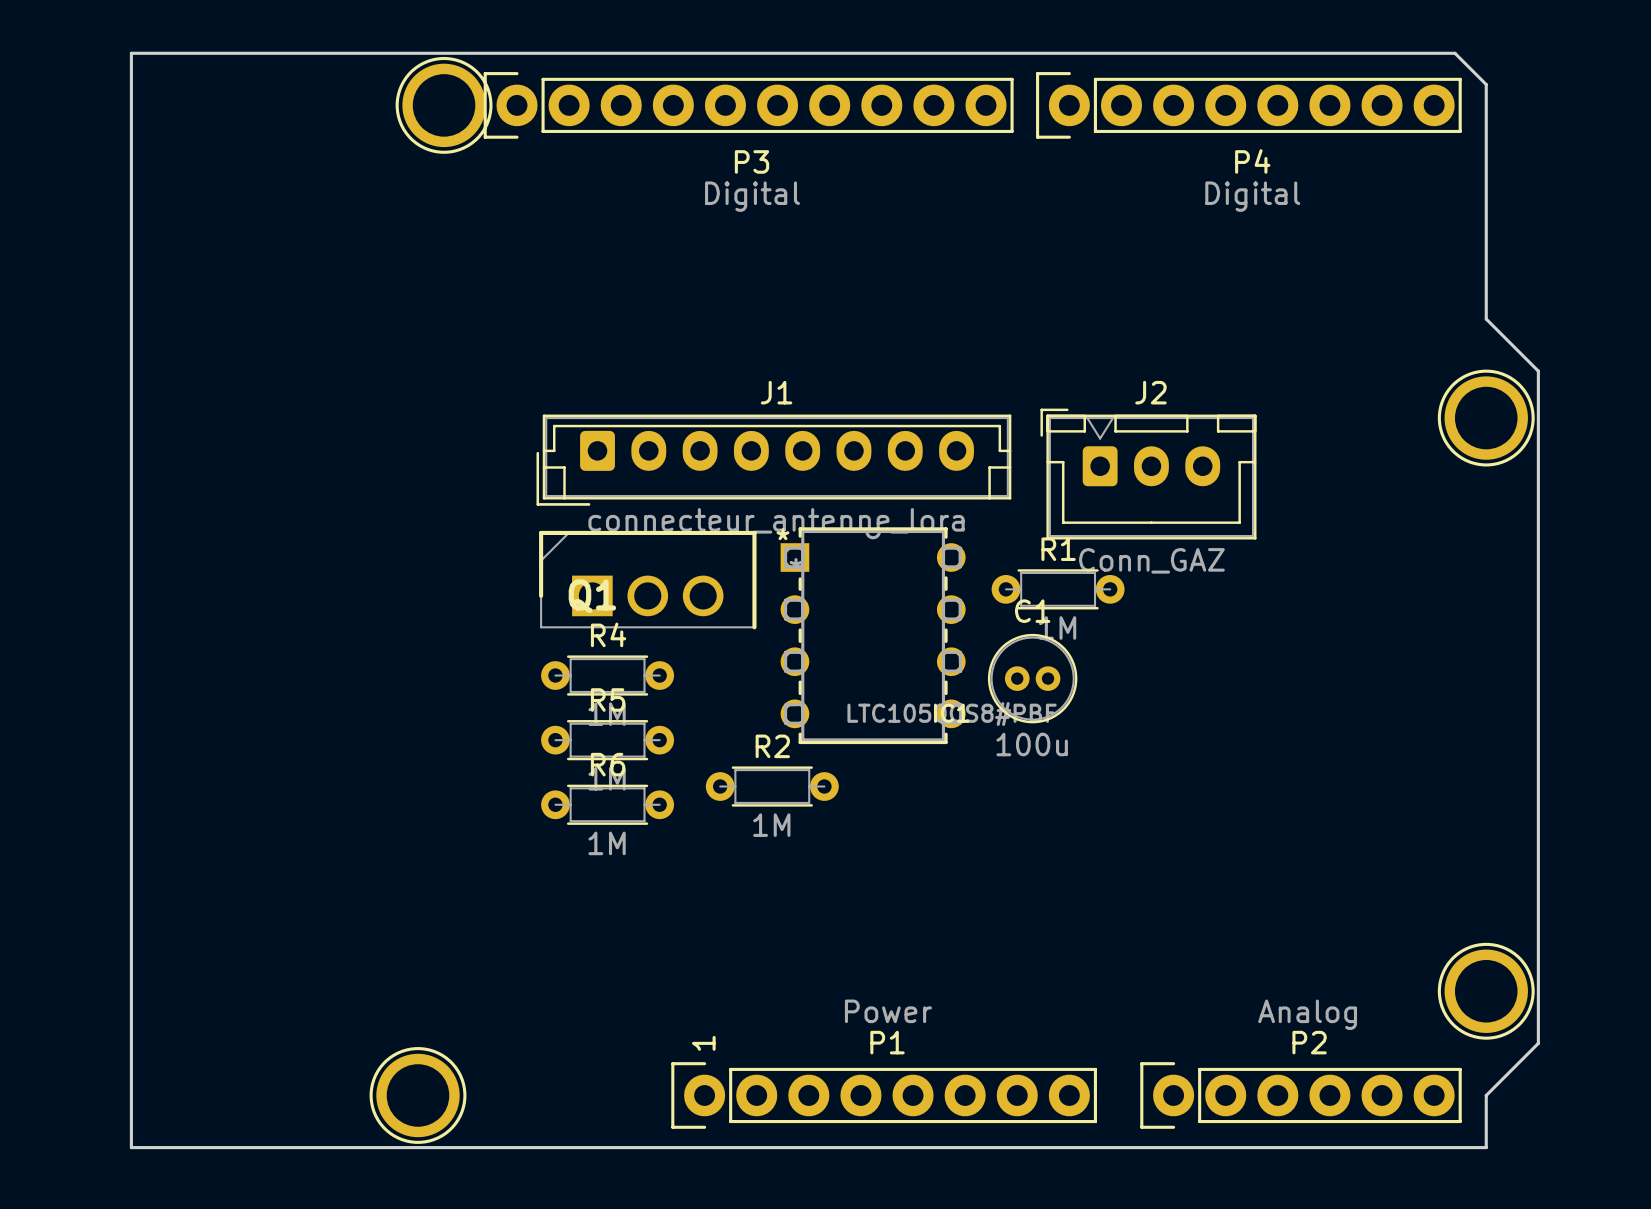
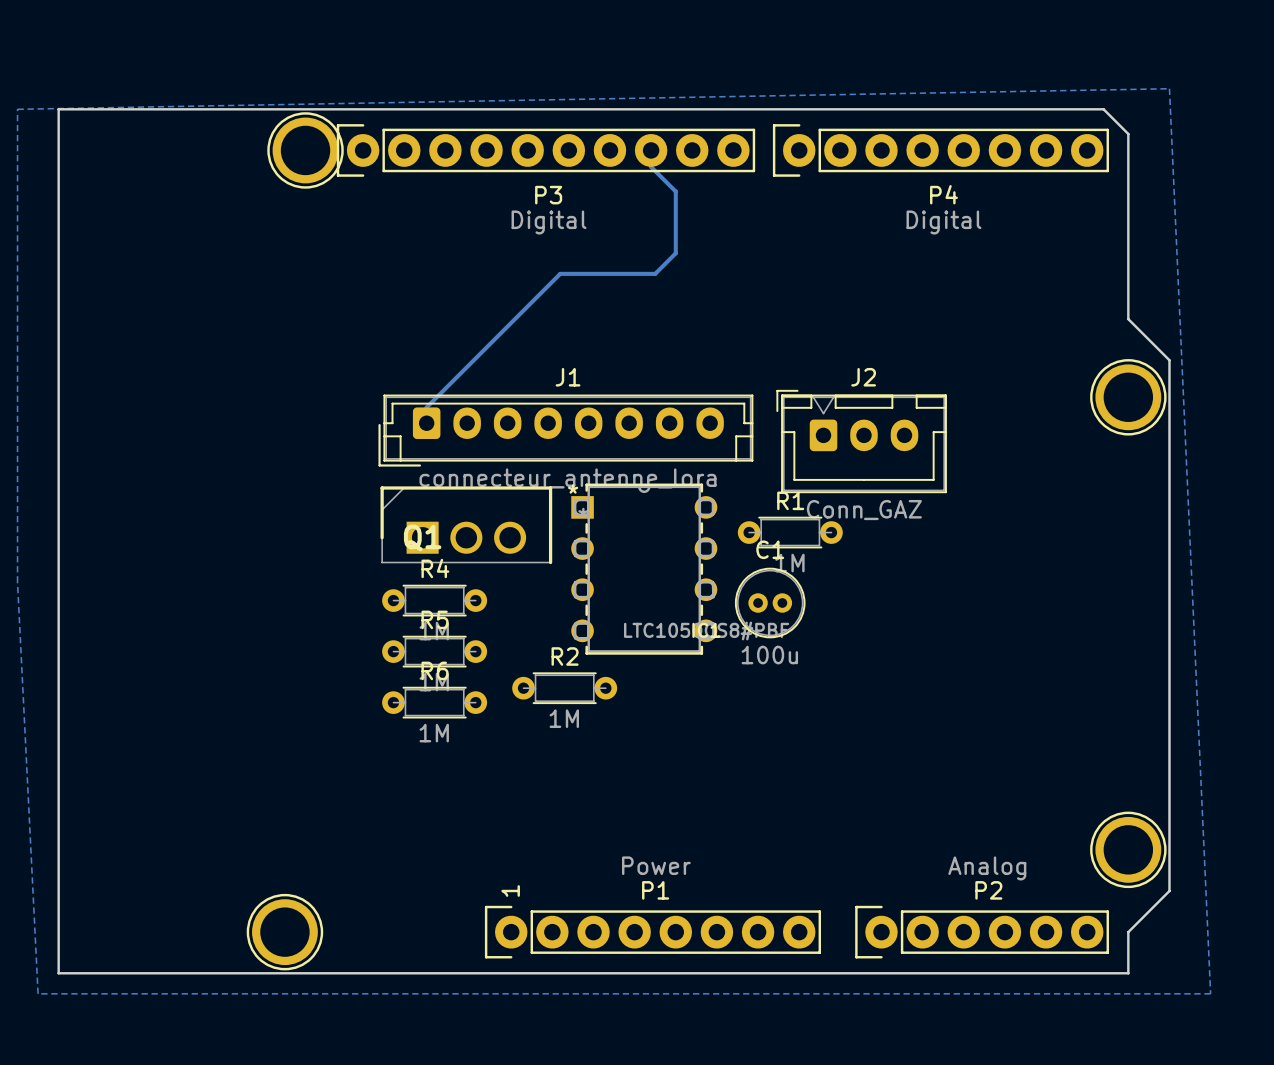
bottom zone outline: none -> (1169, 88) (17, 109) (17, 582) (38, 993) (1210, 993) (1169, 88)
bottom track: none -> (651, 150) (651, 166) (675, 191) (675, 253) (655, 273) (560, 273) (426, 407) (426, 423)

